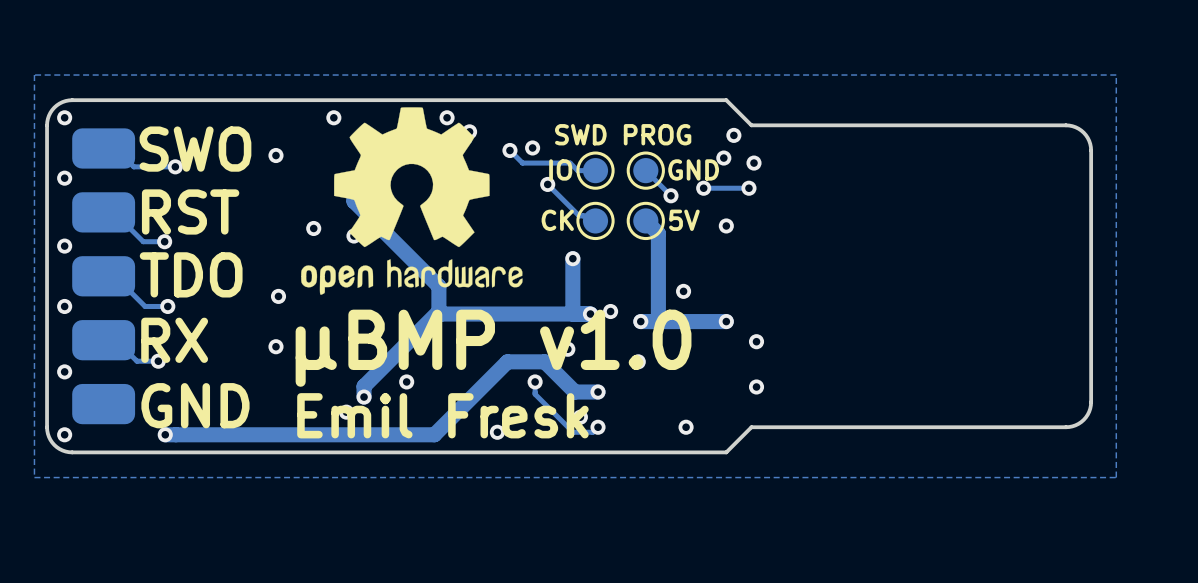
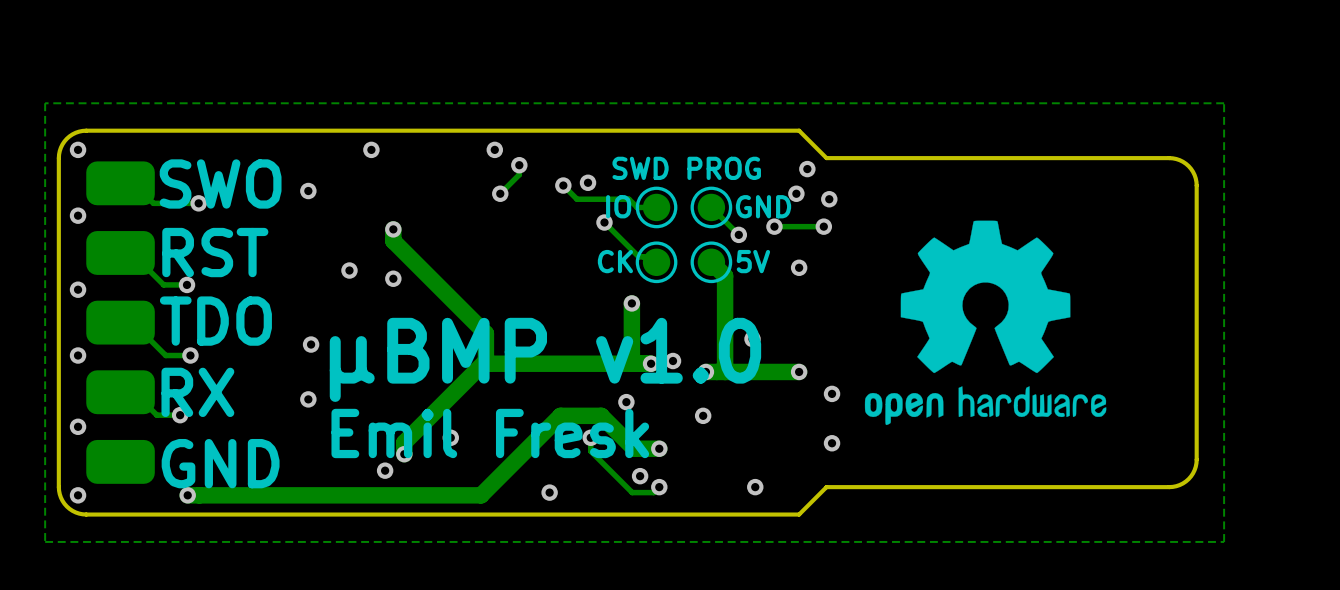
drawing position: (411, 201) -> (985, 322)
text position: µBMP v1.0 (493, 348) -> µBMP v1.0 (545, 359)
text position: Emil Fresk (442, 415) -> Emil Fresk (490, 433)

